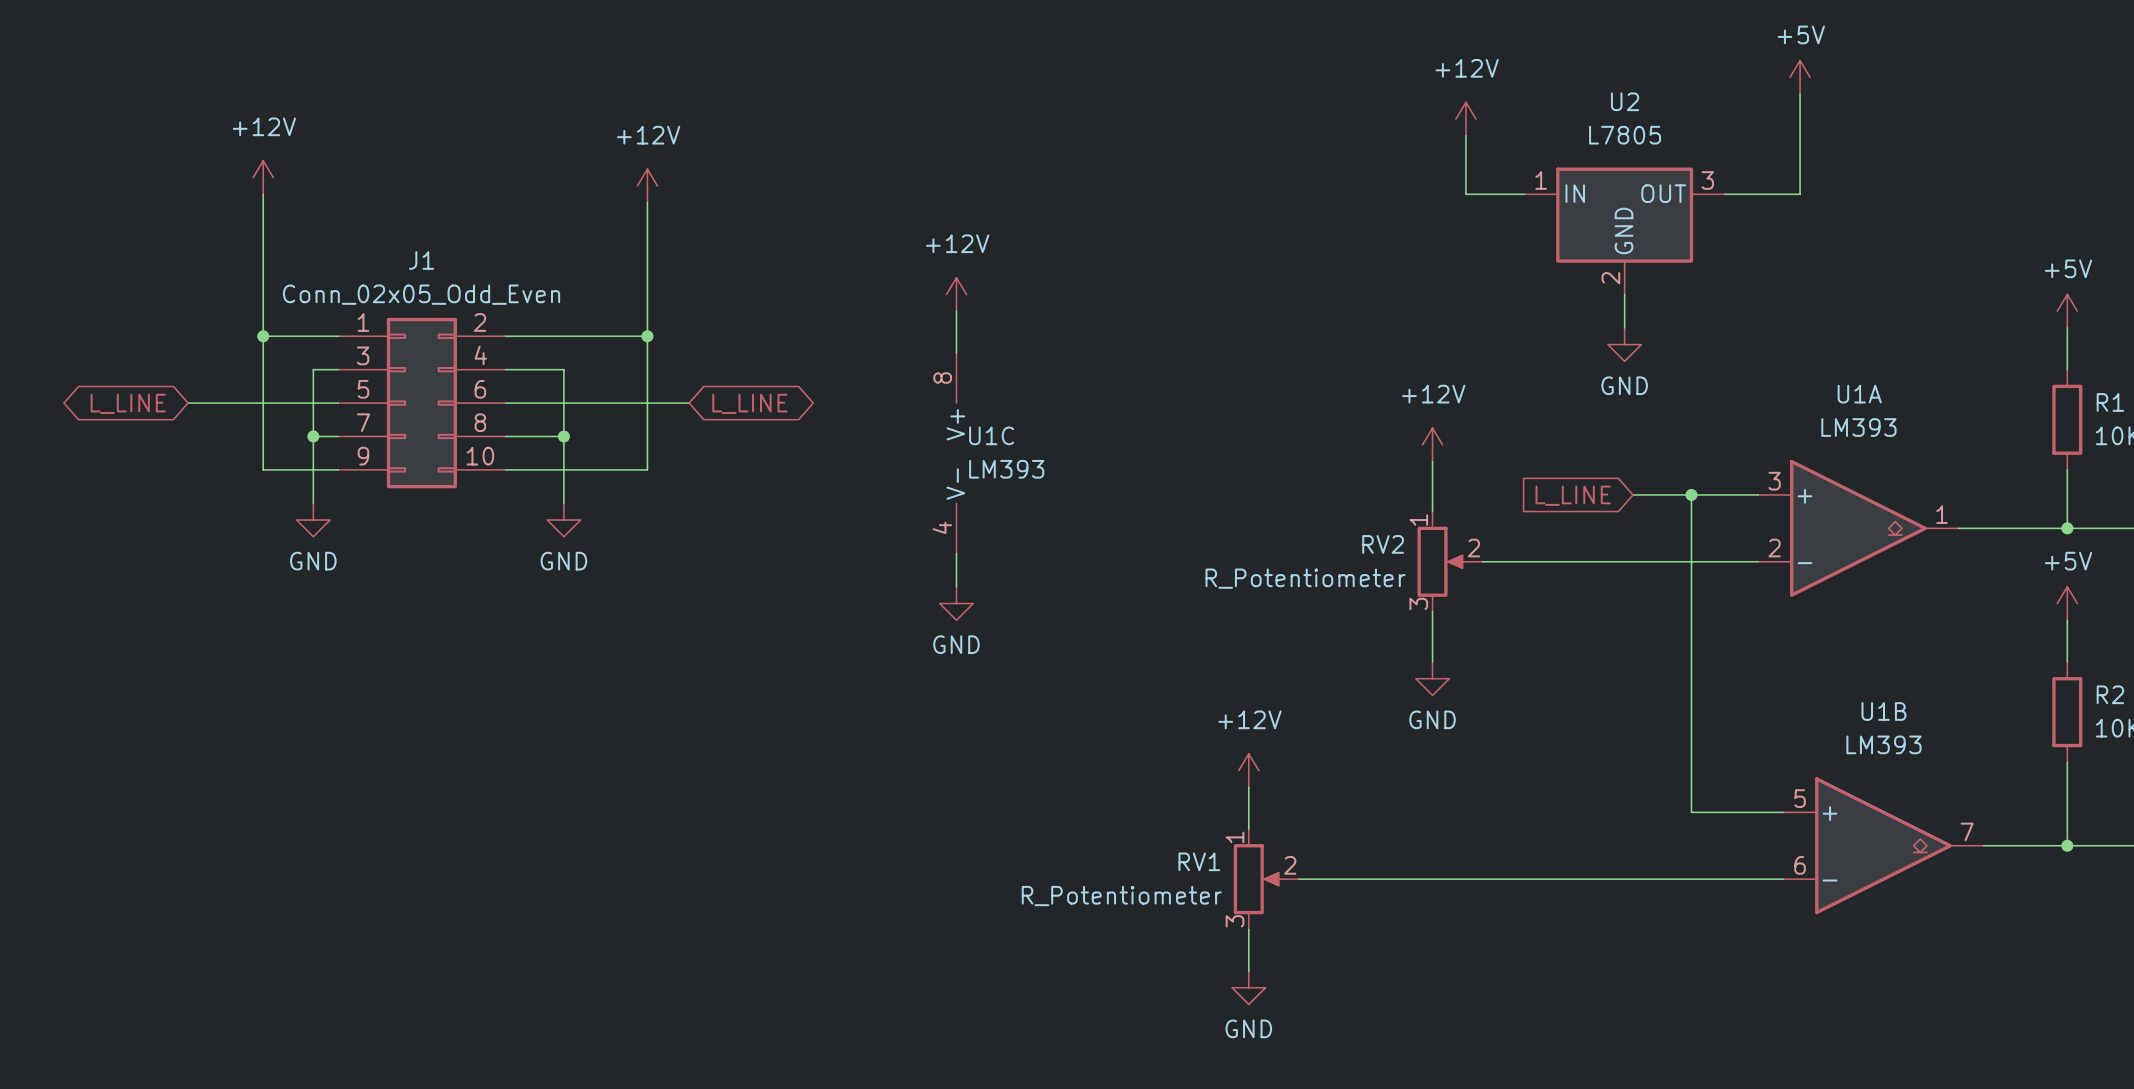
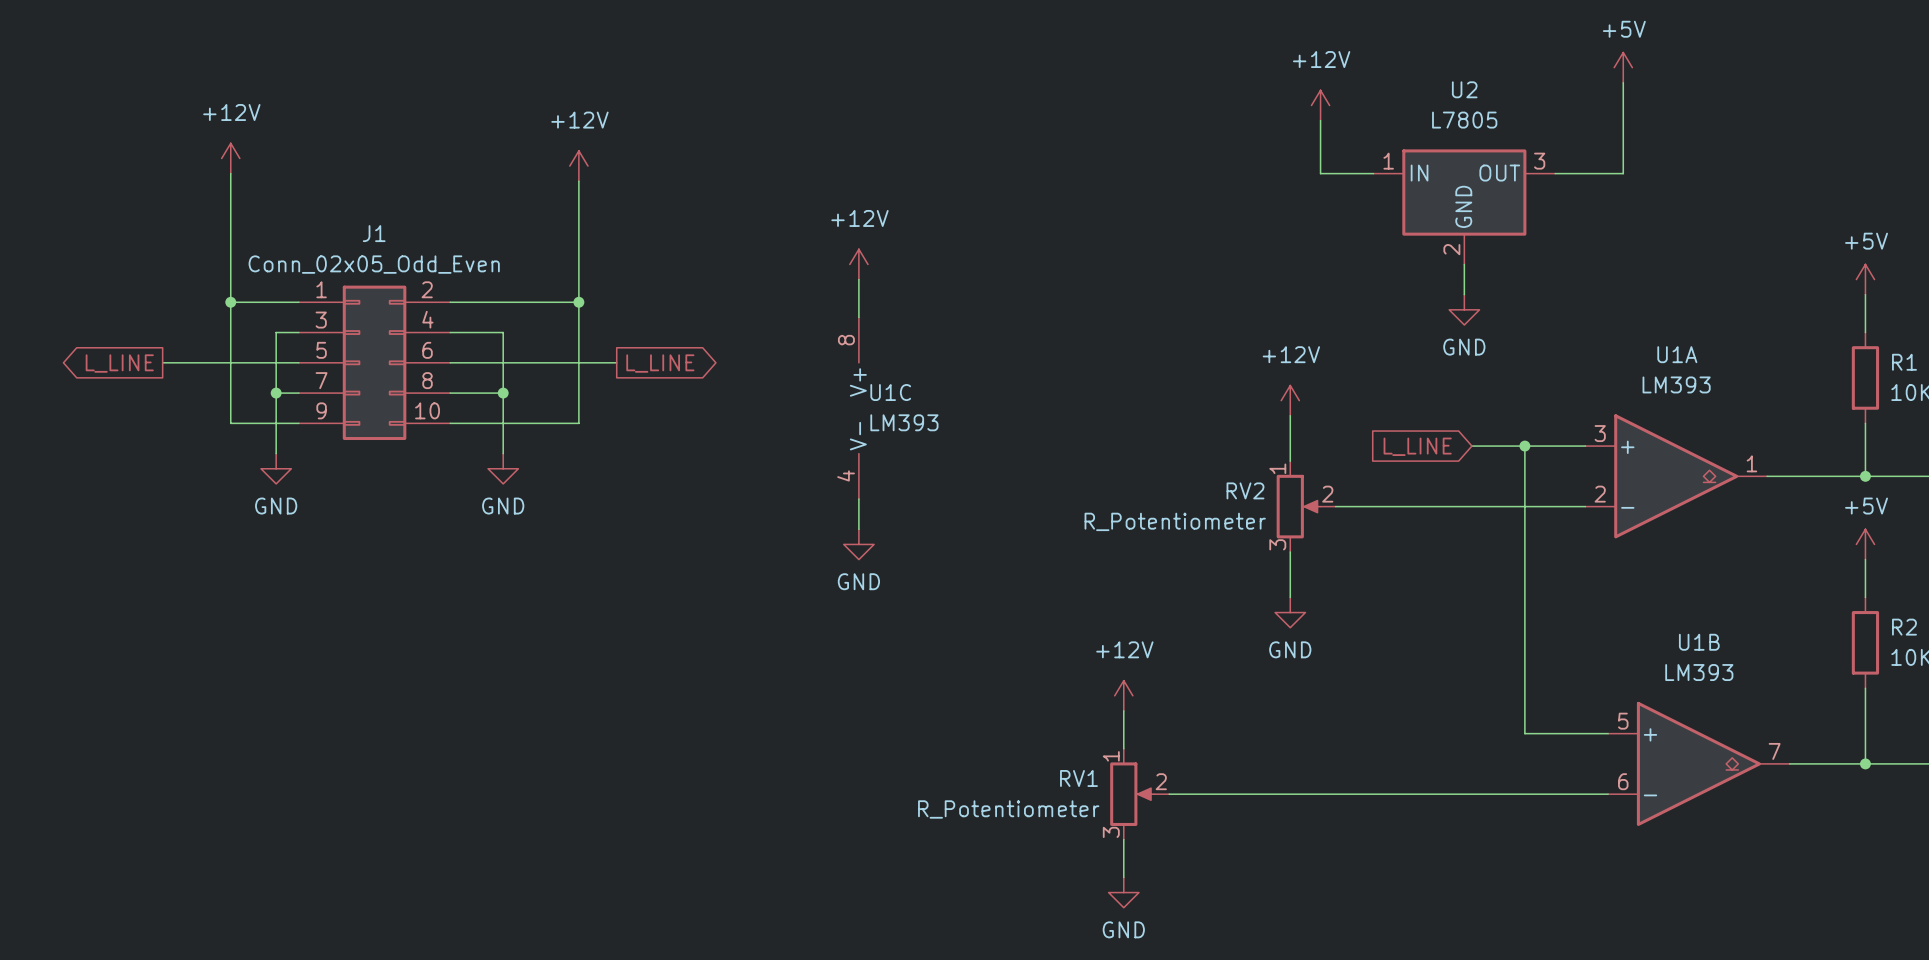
global label shape: bidirectional (128, 403) -> output (119, 363)
global label shape: bidirectional (749, 403) -> output (660, 363)

